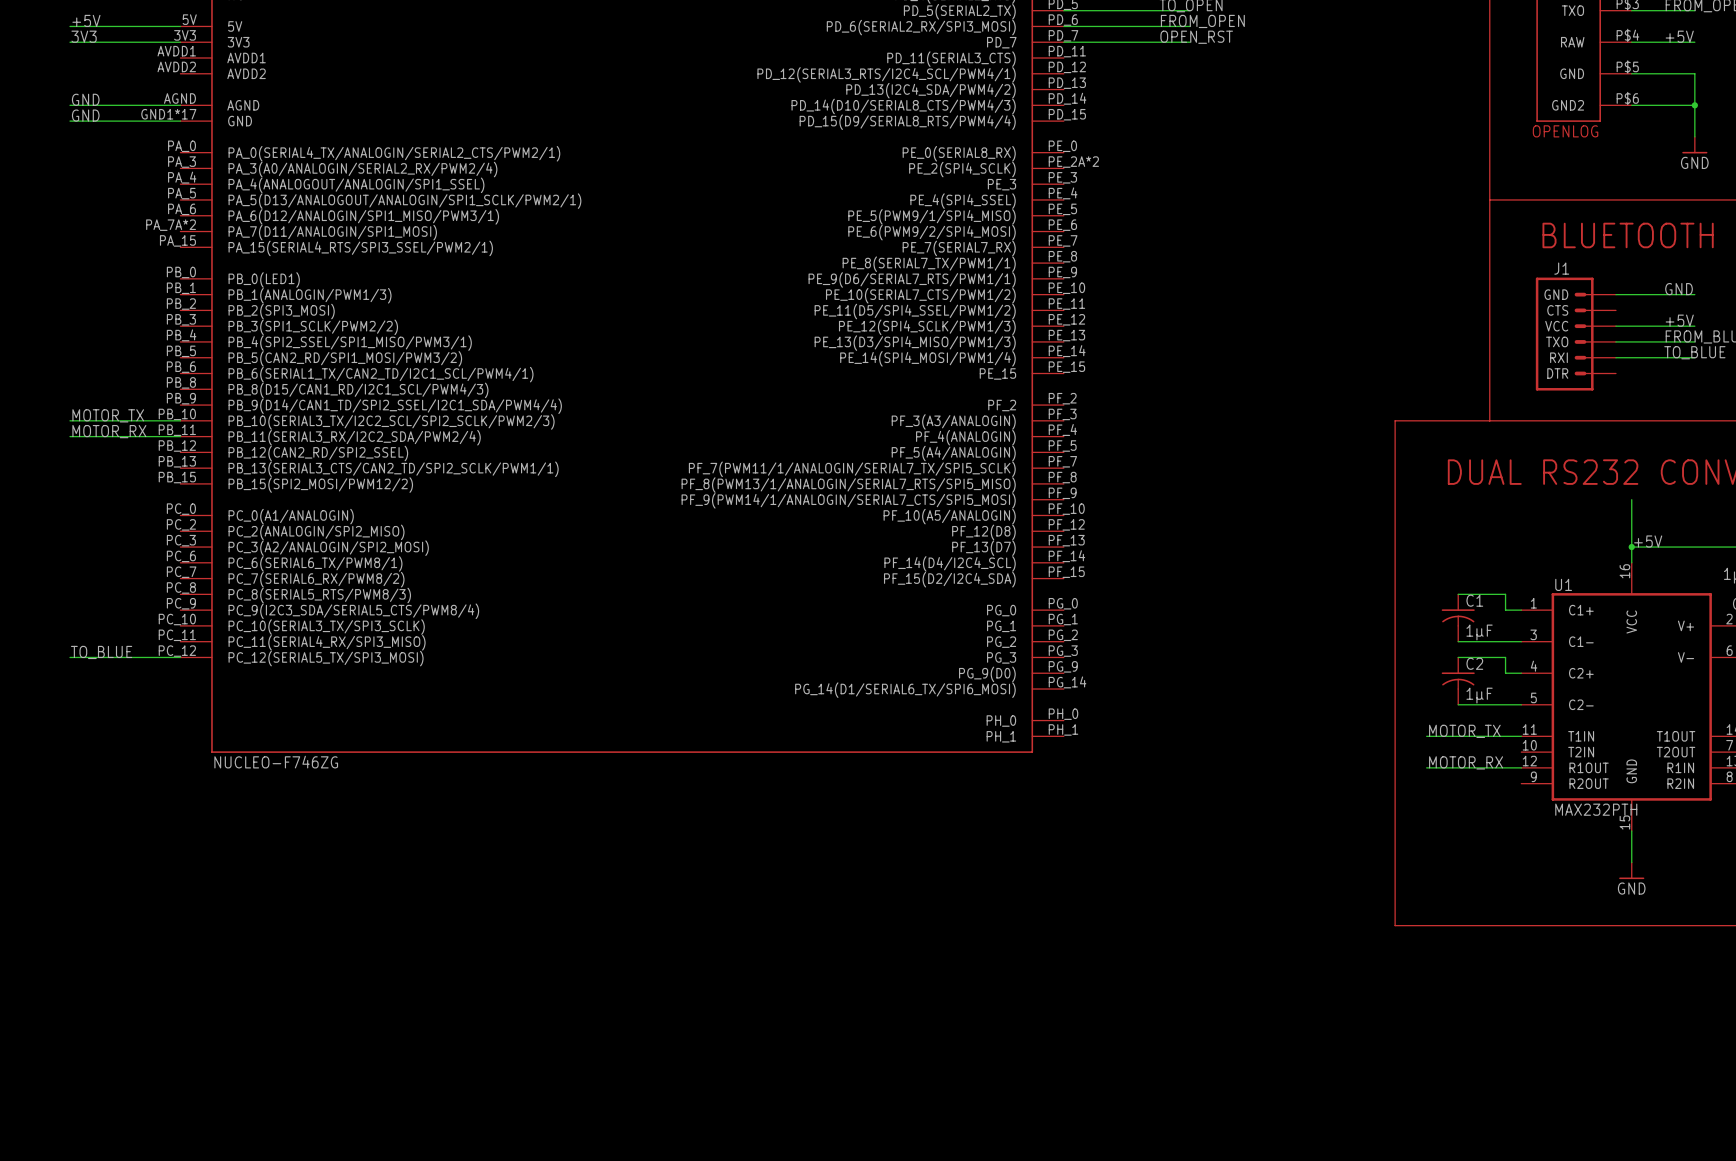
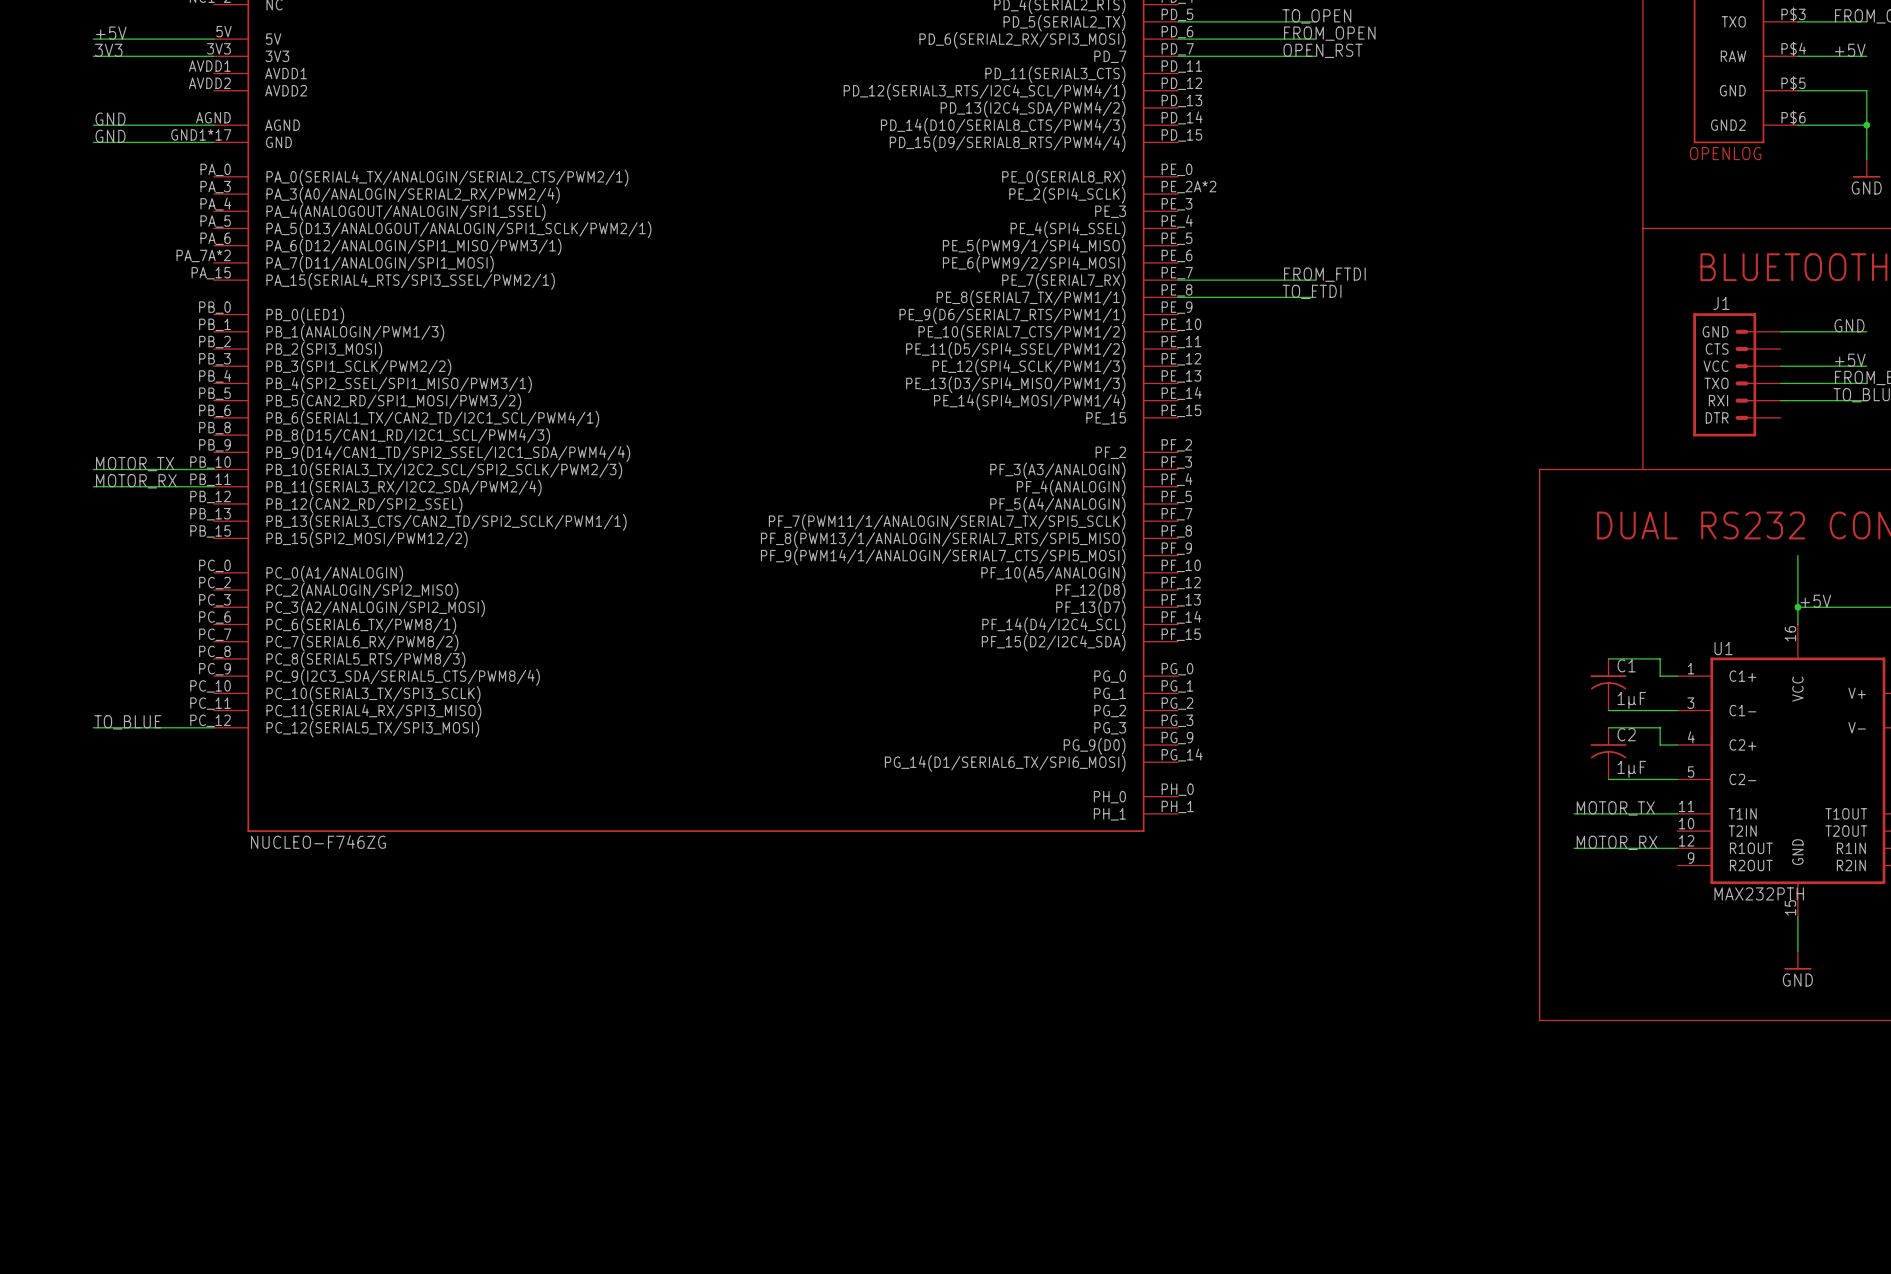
label: none -> FROM_FTDI (1324, 274)
wire: none -> (1178, 280) (1315, 280)
label: none -> TO_FTDI (1311, 291)
wire: none -> (1178, 297) (1315, 297)

